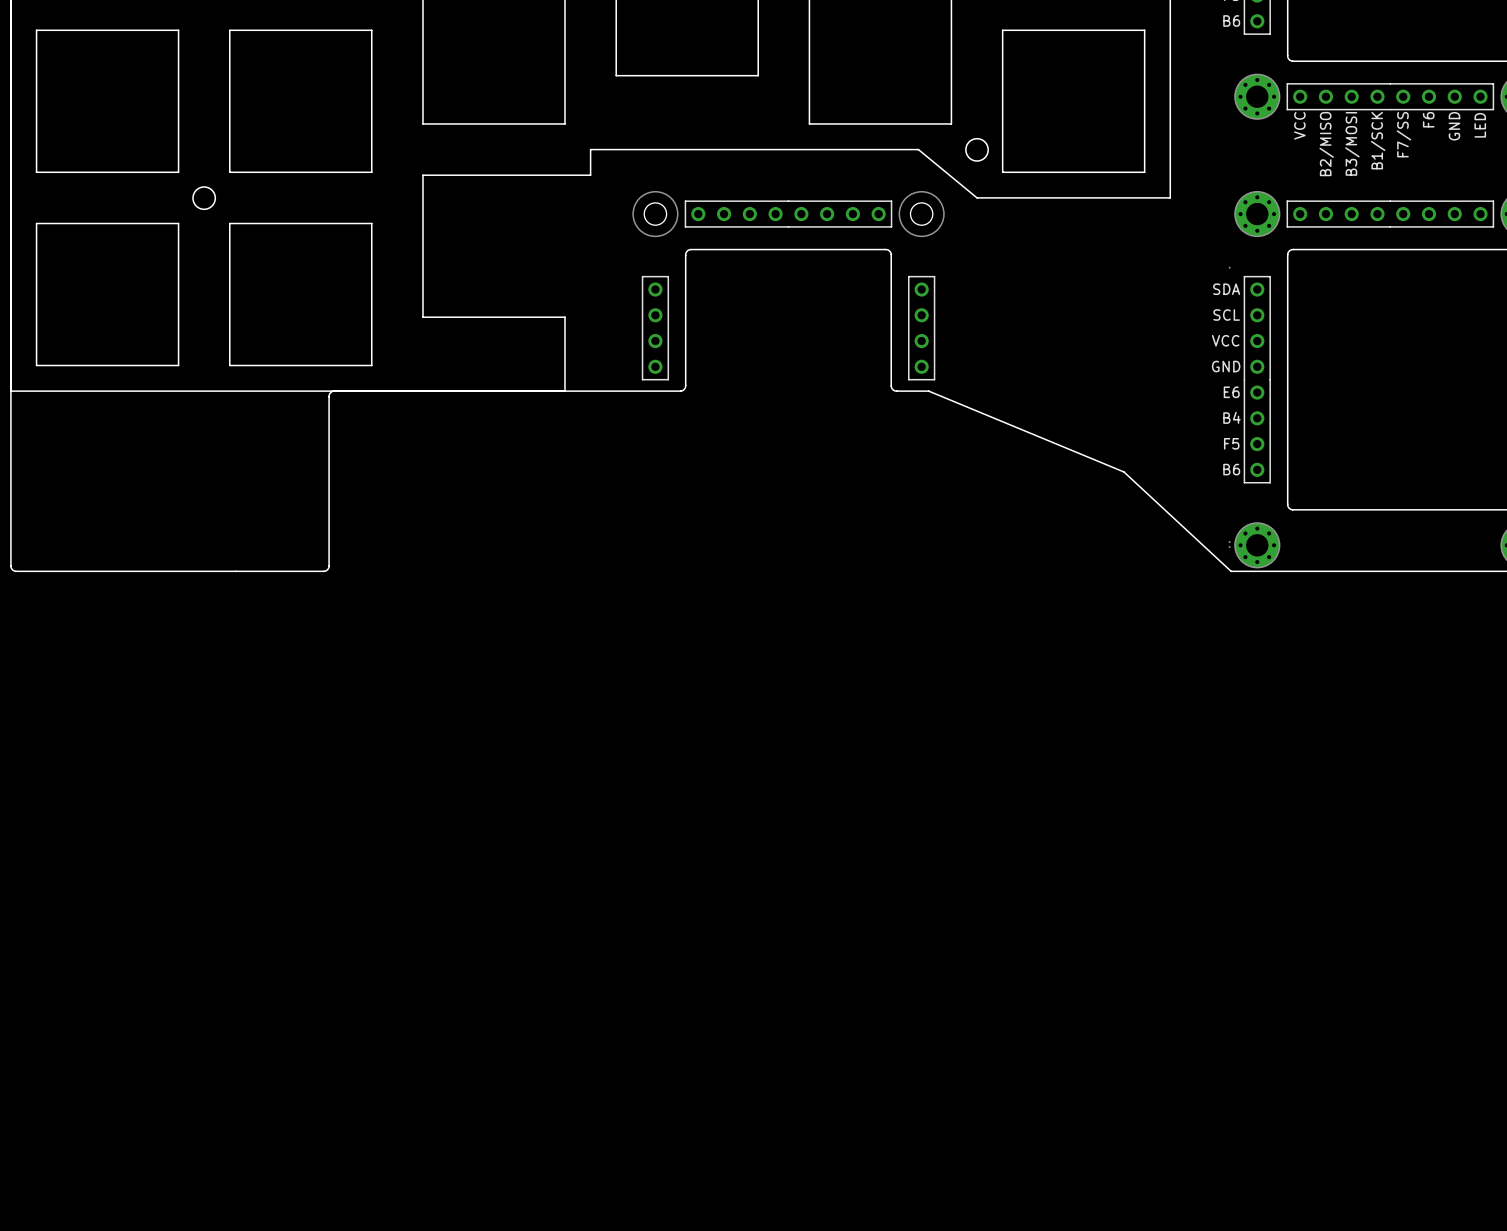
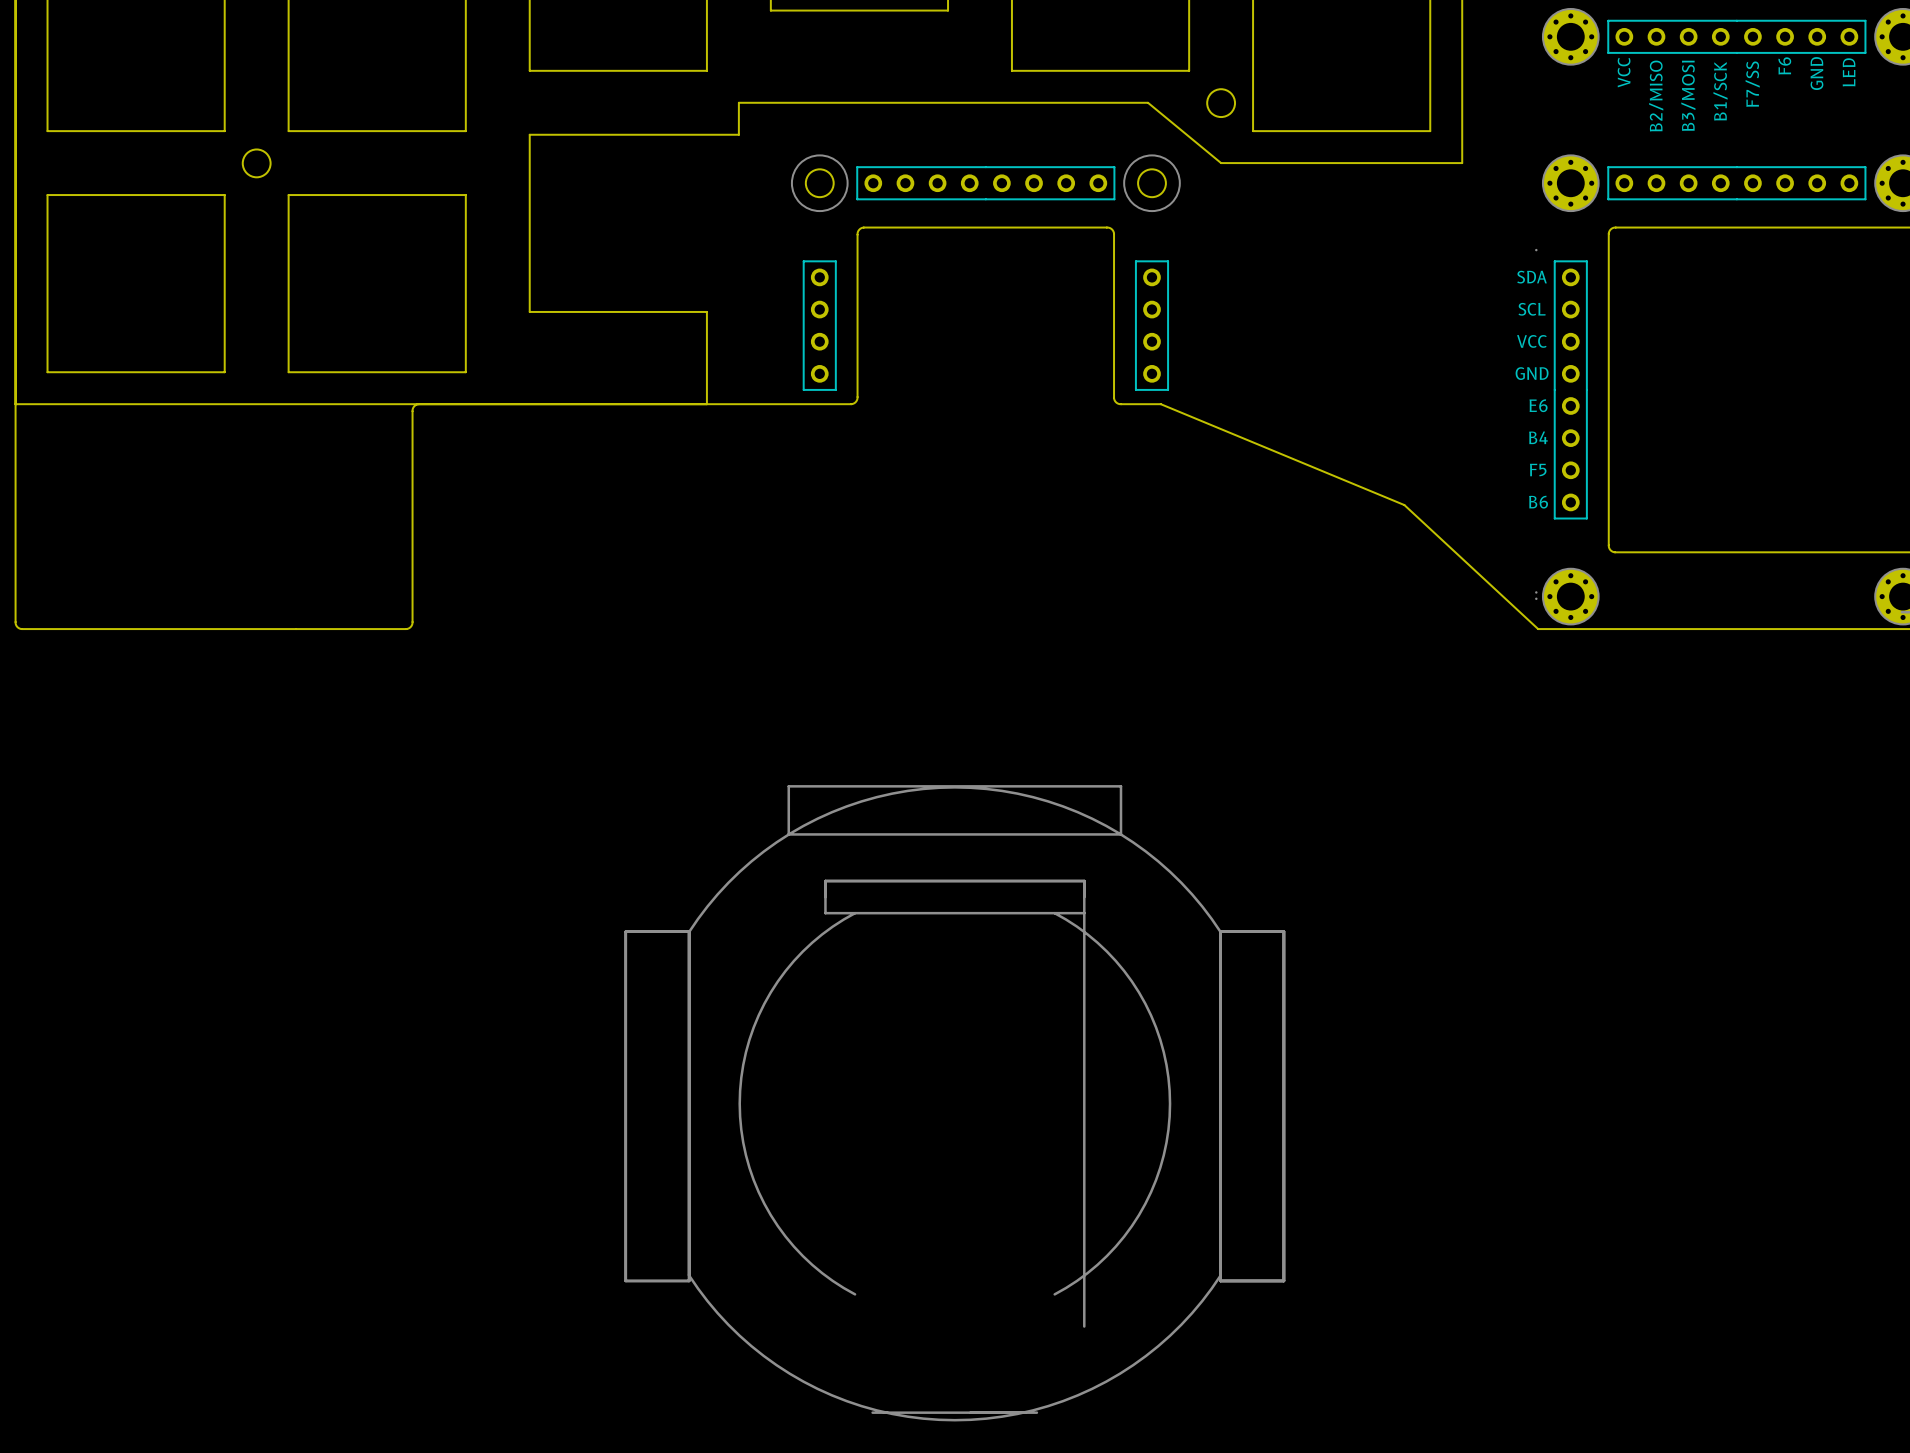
line: none -> (788, 786) (1120, 786) (1120, 834) (788, 834) (788, 786)
line: none -> (855, 913) (822, 934) (802, 951) (785, 970) (770, 992) (758, 1015) (749, 1039) (743, 1064) (739, 1103) (741, 1129) (745, 1155) (758, 1192) (770, 1215) (785, 1236) (812, 1264) (832, 1280) (855, 1294)
line: none -> (1054, 913) (1076, 926) (1106, 951) (1124, 970) (1138, 992) (1151, 1015) (1160, 1039) (1166, 1064) (1170, 1103) (1168, 1129) (1160, 1167) (1151, 1192) (1138, 1215) (1124, 1236) (1106, 1256) (1087, 1273) (1054, 1294)
line: none -> (1084, 913) (1084, 881) (825, 881) (825, 913) (1084, 913) (1084, 1326)
line: none -> (625, 931) (689, 931) (689, 1280) (625, 1280) (625, 931)
line: none -> (1220, 931) (1283, 931) (1283, 1280) (1220, 1280) (1220, 931)
line: none -> (689, 932) (707, 906) (739, 871) (776, 842) (803, 825) (846, 806) (876, 797) (907, 790) (954, 787) (1002, 790) (1032, 797) (1077, 812) (1106, 825) (1145, 851) (1170, 871) (1192, 894) (1220, 932)
line: none -> (689, 1275) (717, 1313) (739, 1335) (763, 1356) (803, 1381) (831, 1395) (876, 1410) (907, 1416) (954, 1420) (1002, 1416) (1032, 1410) (1063, 1401) (1106, 1381) (1133, 1365) (1170, 1335) (1192, 1313) (1220, 1275)
line: none -> (872, 1412) (1036, 1412)

